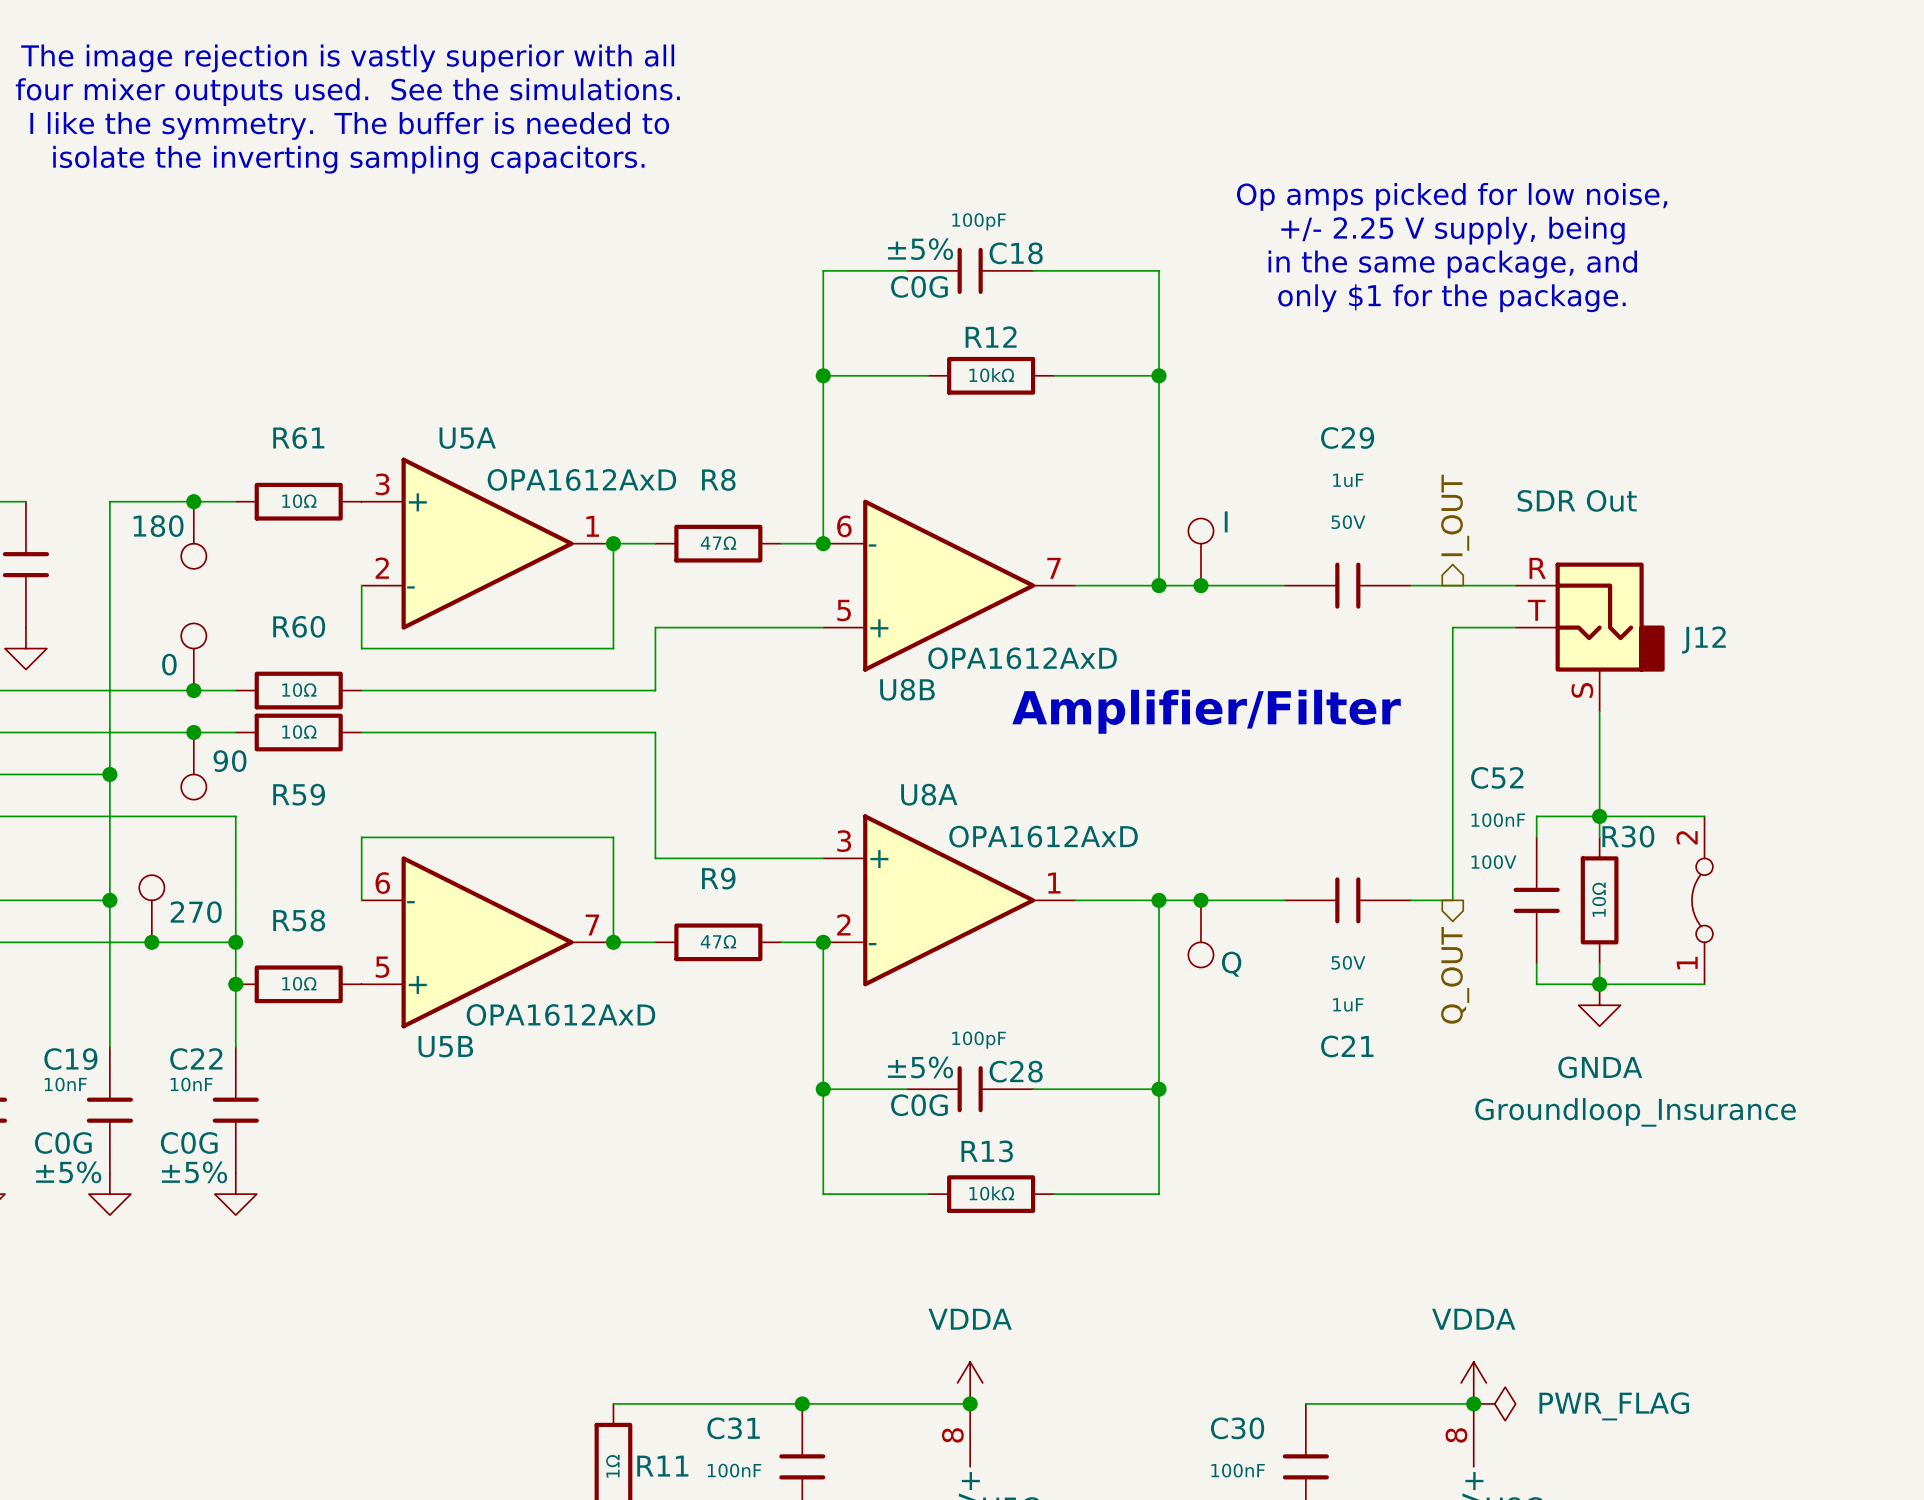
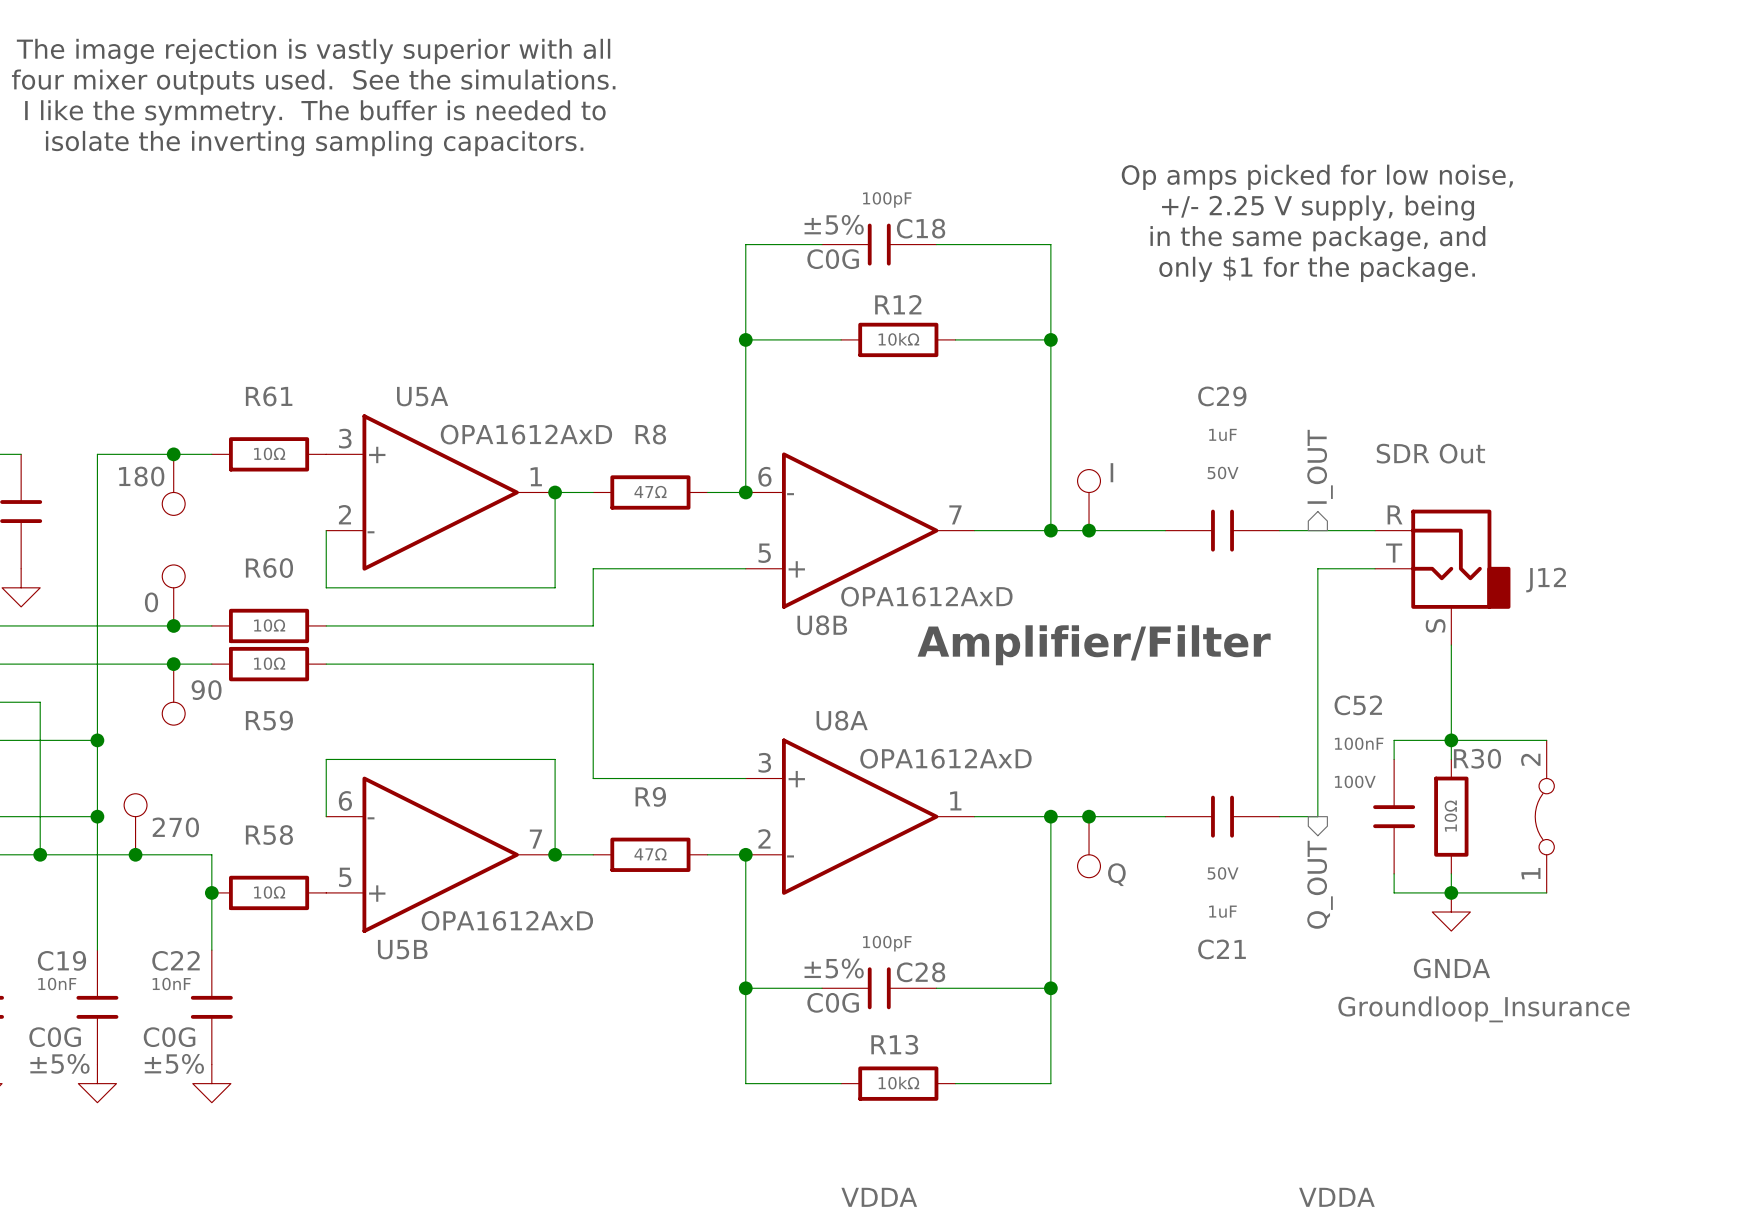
wire: (46, 774) (109, 774) -> (40, 702) (40, 854)
junction position: (109, 774) -> (97, 740)
wire: (109, 816) (235, 816) (235, 942) -> none
junction: none -> (40, 854)
junction: (235, 942) -> none

